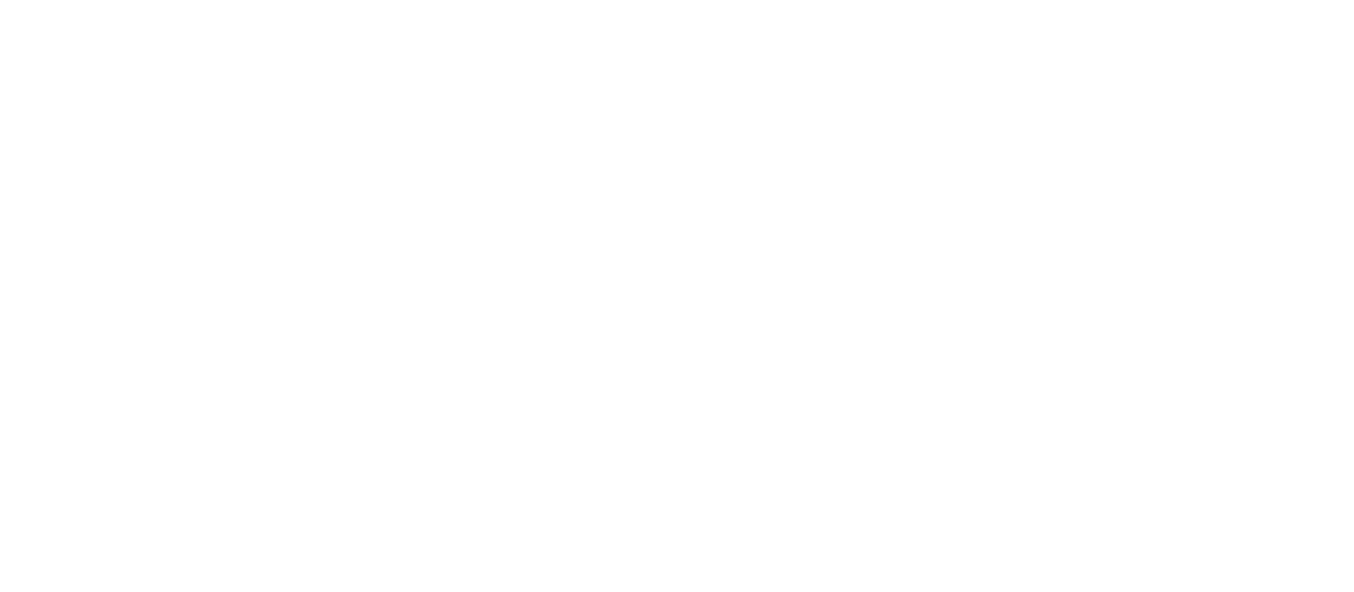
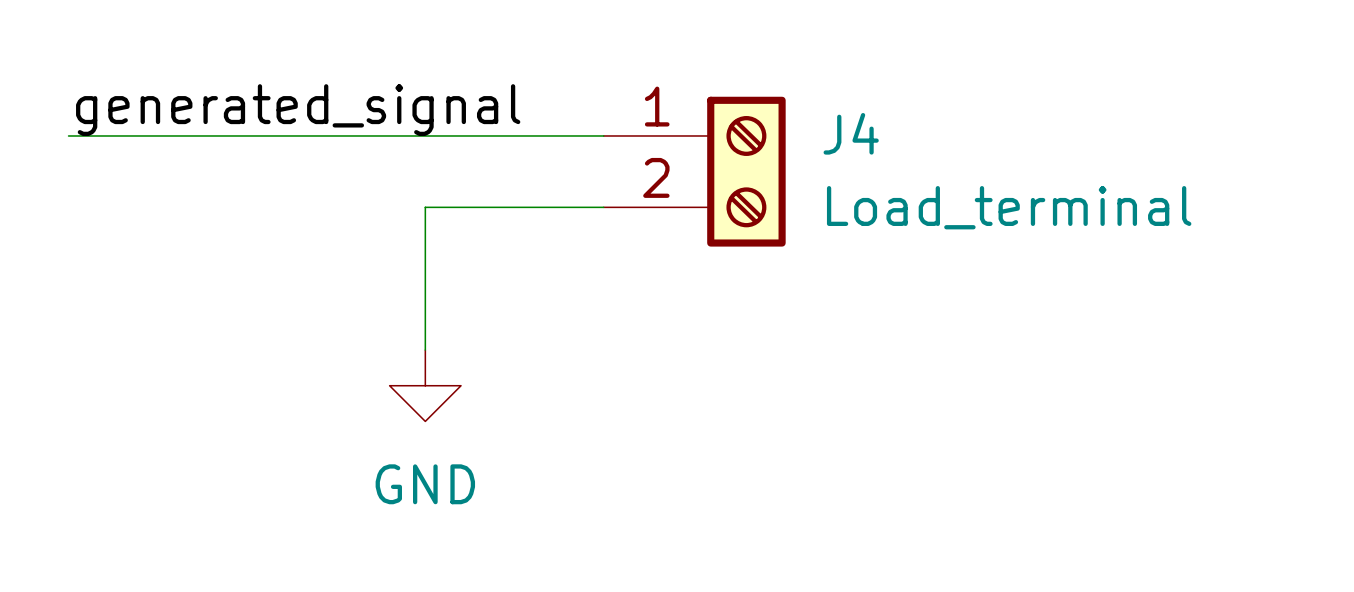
label: none -> generated_signal (298, 110)
wire: none -> (68, 135) (603, 135)
J4: none -> Load_terminal (694, 171)
wire: none -> (603, 207) (425, 207) (425, 350)
power symbol: none -> GND (425, 385)

